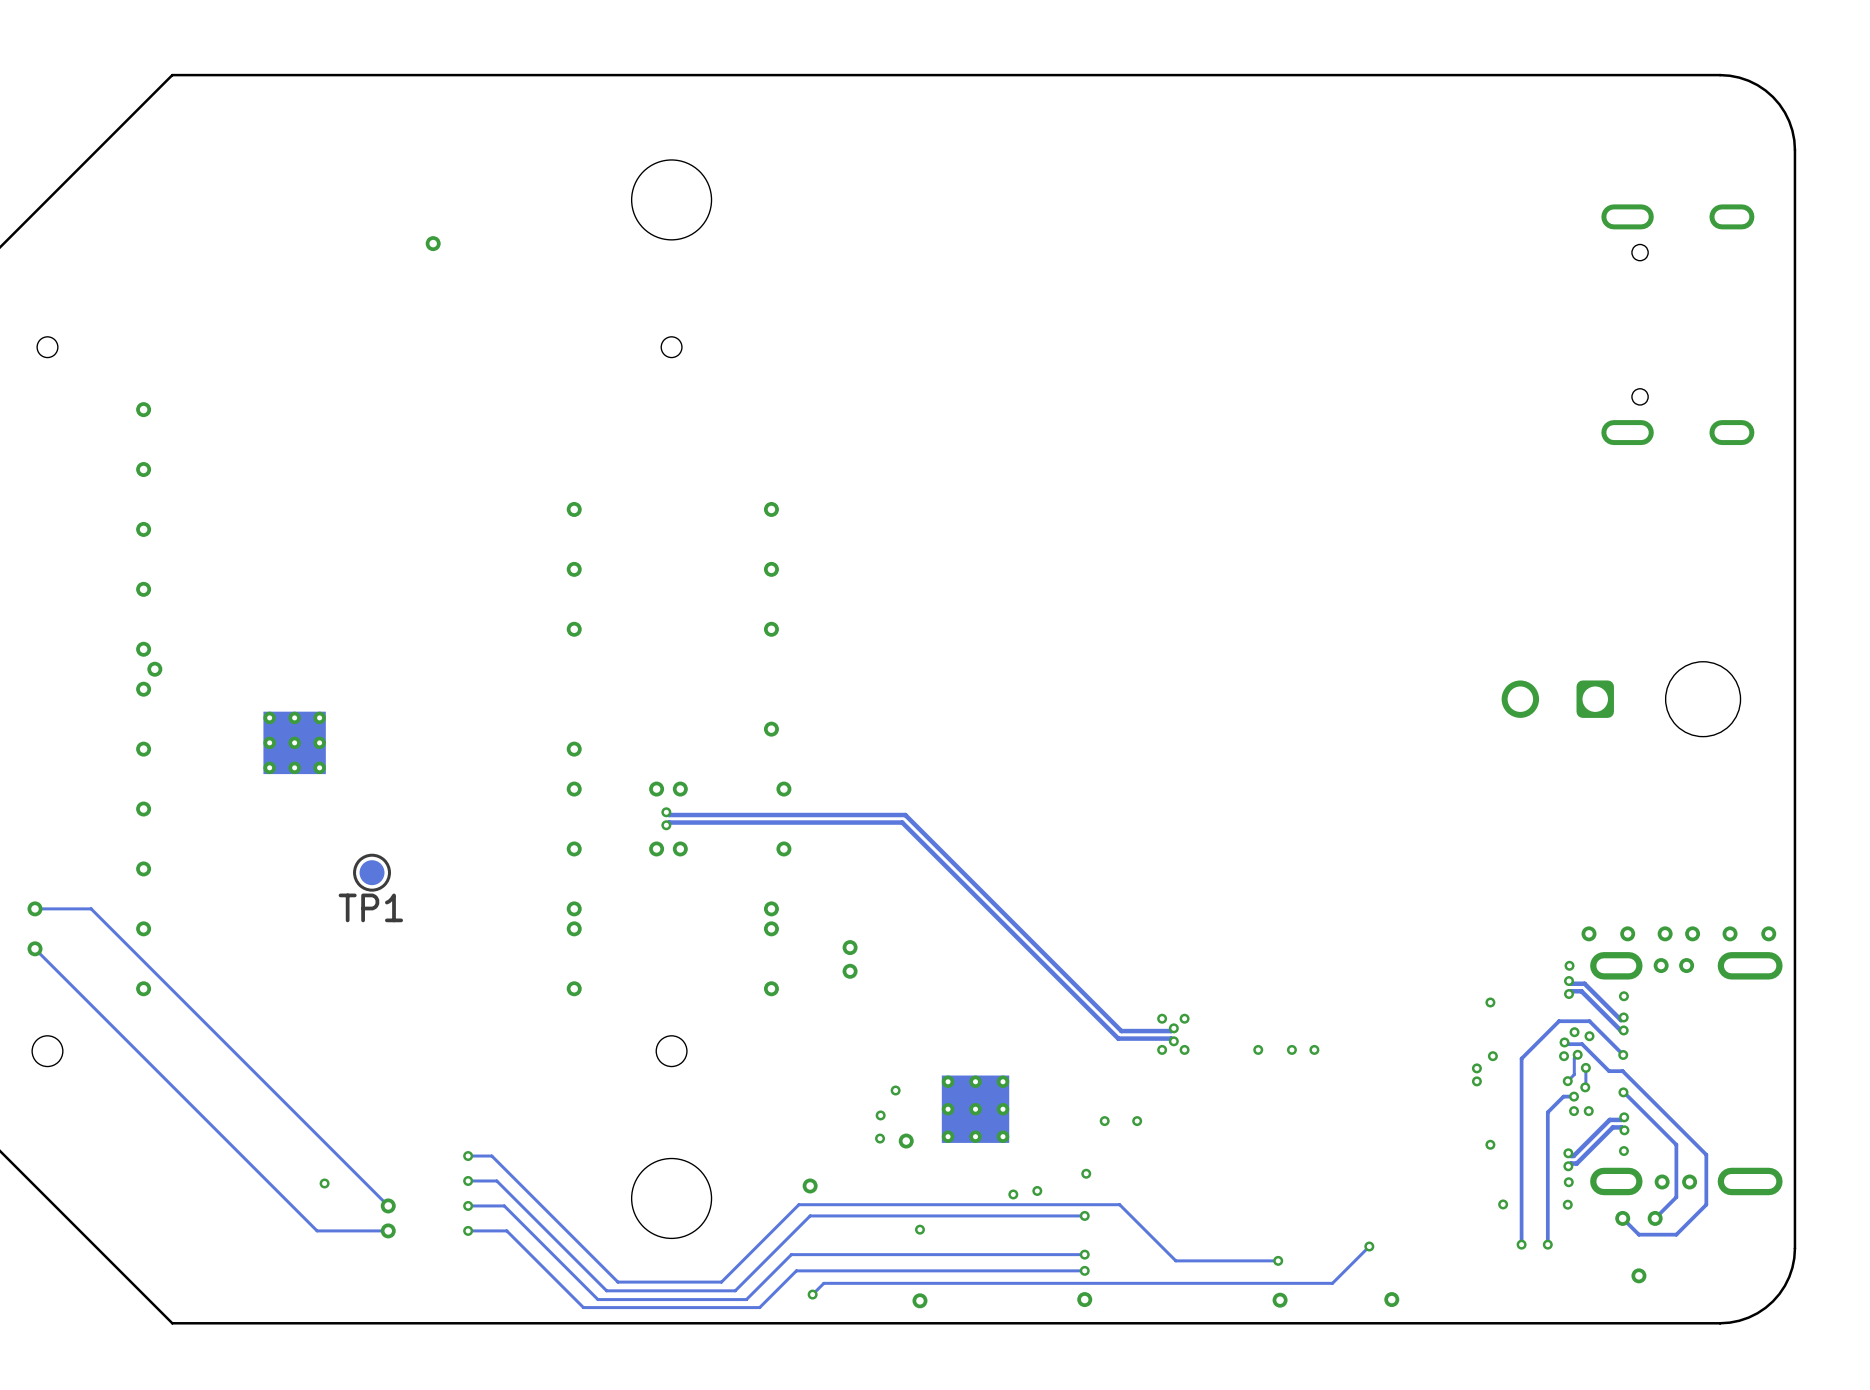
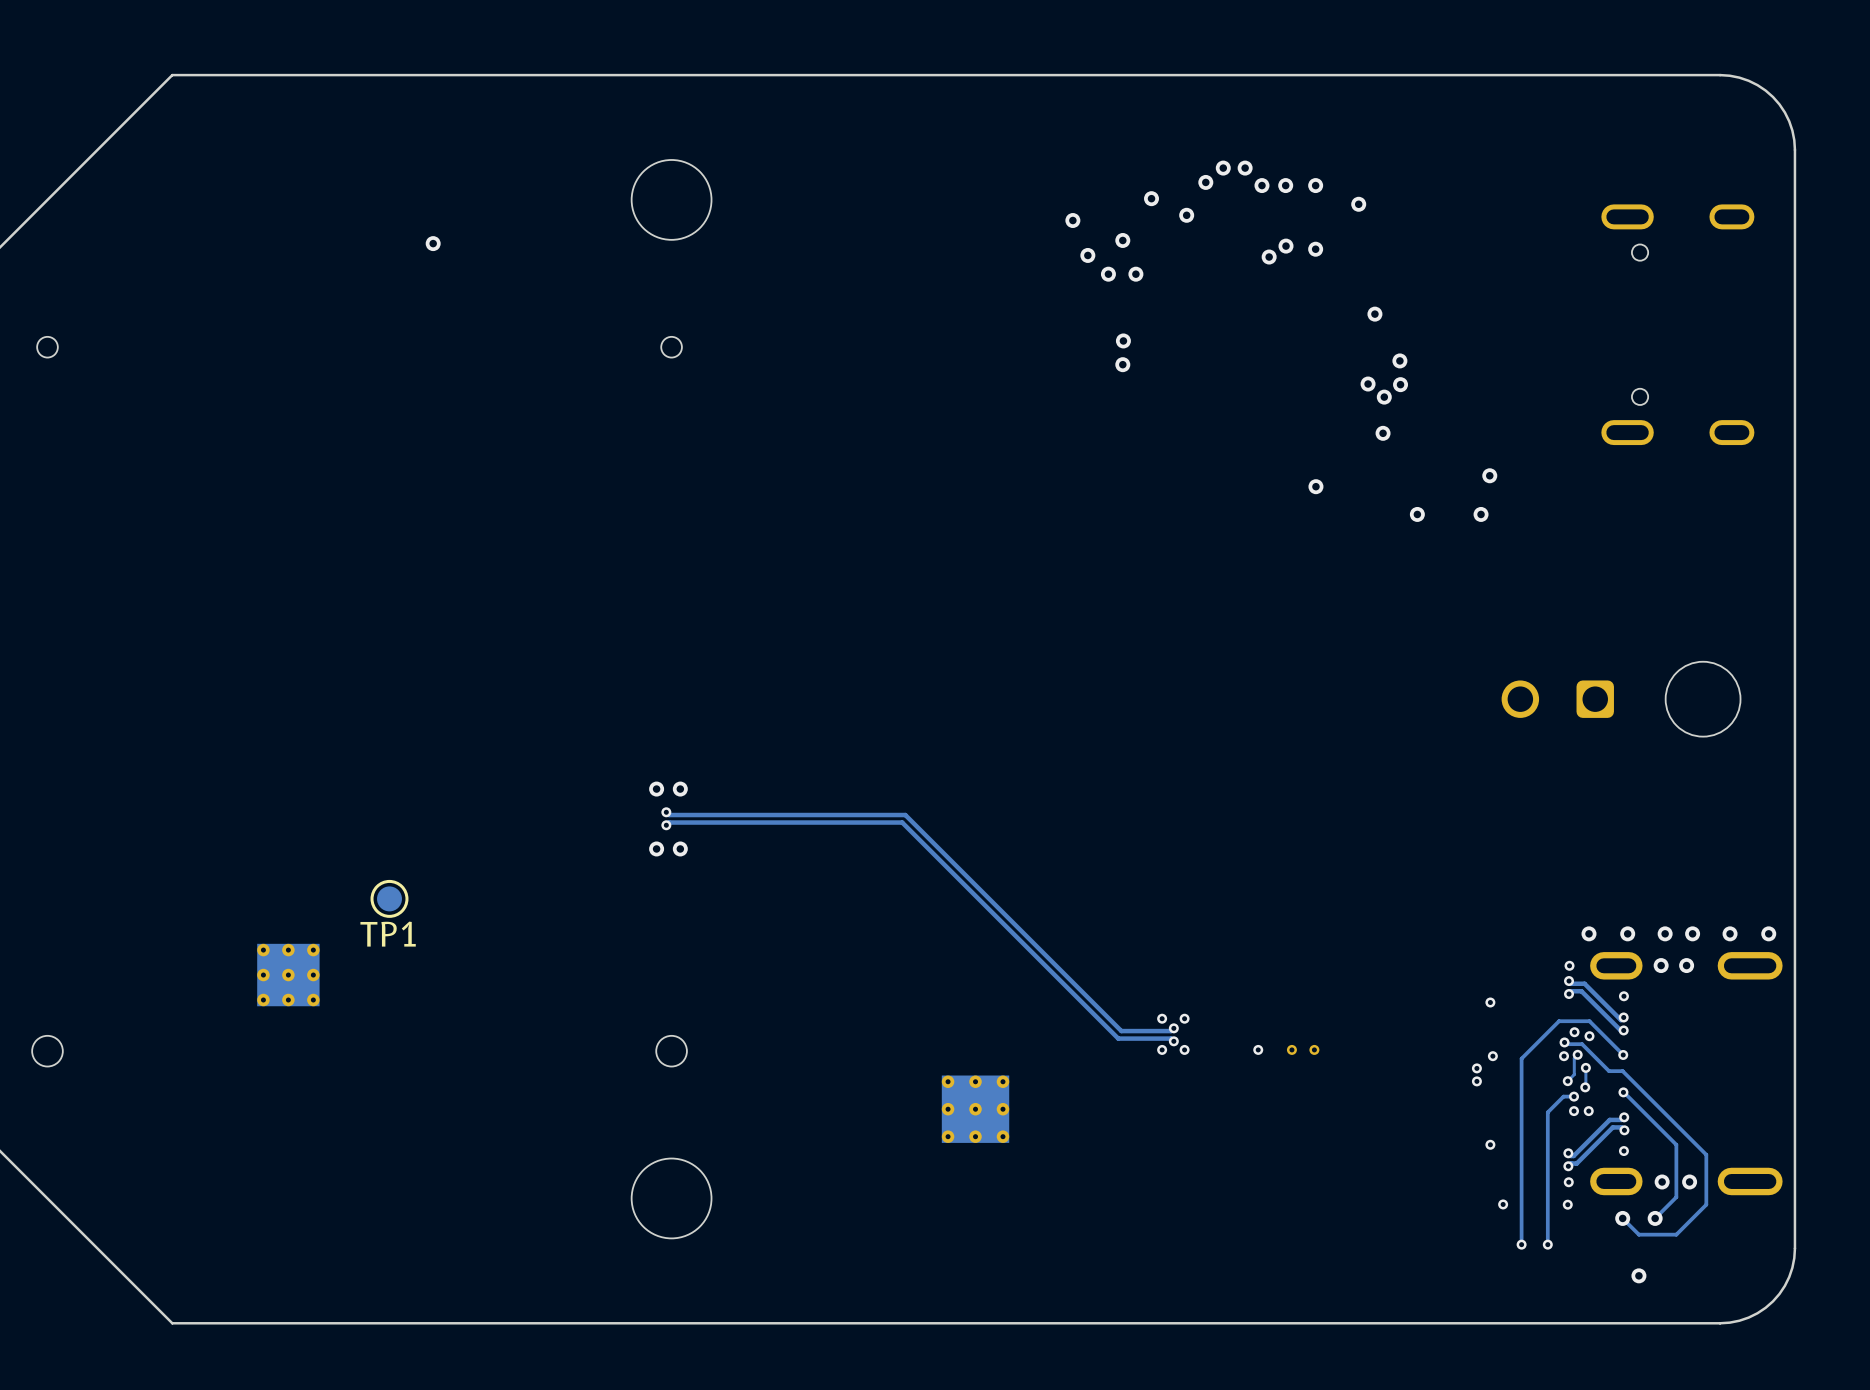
via: none -> (1223, 168)
via: none -> (1245, 168)
via: none -> (1205, 182)
via: none -> (1261, 185)
via: none -> (1285, 185)
via: none -> (1315, 185)
via: none -> (1151, 198)
via: none -> (1358, 204)
via: none -> (1186, 215)
via: none -> (1072, 220)
via: none -> (1122, 240)
via: none -> (1286, 246)
via: none -> (1315, 249)
via: none -> (1087, 255)
via: none -> (1269, 257)
via: none -> (1108, 274)
via: none -> (1135, 274)
via: none -> (1374, 314)
via: none -> (1123, 340)
via: none -> (1399, 360)
via: none -> (1122, 364)
via: none -> (1368, 384)
via: none -> (1400, 384)
via: none -> (1384, 397)
via: (143, 409) -> none
via: none -> (1383, 433)
via: (143, 469) -> none
via: none -> (1489, 475)
via: none -> (1315, 486)
via: (574, 509) -> none
via: (771, 509) -> none
via: none -> (1417, 514)
via: none -> (1481, 514)
via: (143, 529) -> none
via: (574, 569) -> none
via: (771, 569) -> none
via: (143, 589) -> none
via: (574, 629) -> none
via: (771, 629) -> none
via: (143, 649) -> none
via: (154, 669) -> none
via: (143, 689) -> none
via: (771, 729) -> none
part position: (294, 742) -> (288, 975)
via: (143, 749) -> none
via: (574, 749) -> none
via: (574, 789) -> none
via: (783, 789) -> none
via: (143, 809) -> none
via: (574, 848) -> none
via: (783, 848) -> none
via: (143, 868) -> none
TP1 position: (372, 872) -> (389, 898)
track: (35, 908) (91, 908) (388, 1205) -> none
via: (35, 908) -> none
via: (574, 908) -> none
via: (771, 908) -> none
via: (143, 928) -> none
via: (574, 928) -> none
via: (771, 928) -> none
via: (850, 947) -> none
track: (35, 948) (317, 1230) (388, 1230) -> none
via: (35, 948) -> none
via: (850, 971) -> none
via: (143, 988) -> none
via: (574, 988) -> none
via: (771, 988) -> none
via: (895, 1090) -> none
via: (880, 1115) -> none
via: (1104, 1121) -> none
via: (1137, 1121) -> none
via: (880, 1138) -> none
via: (906, 1141) -> none
track: (468, 1156) (491, 1156) (617, 1282) (721, 1282) (798, 1204) (1119, 1204) (1175, 1260) (1278, 1260) -> none
via: (468, 1156) -> none
via: (1086, 1173) -> none
track: (468, 1180) (496, 1180) (606, 1290) (735, 1290) (810, 1215) (1084, 1215) -> none
via: (468, 1180) -> none
via: (324, 1183) -> none
via: (810, 1185) -> none
via: (1037, 1190) -> none
via: (1013, 1194) -> none
via: (388, 1205) -> none
track: (468, 1205) (504, 1205) (597, 1299) (746, 1299) (791, 1254) (1084, 1254) -> none
via: (468, 1205) -> none
via: (1084, 1215) -> none
via: (919, 1229) -> none
via: (388, 1230) -> none
track: (468, 1230) (506, 1230) (583, 1307) (759, 1307) (796, 1270) (1084, 1270) -> none
via: (468, 1230) -> none
track: (1369, 1246) (1332, 1283) (823, 1283) (812, 1294) -> none
via: (1369, 1246) -> none
via: (1084, 1254) -> none
via: (1278, 1260) -> none
via: (1084, 1270) -> none
via: (812, 1294) -> none
via: (1084, 1299) -> none
via: (1391, 1299) -> none
via: (919, 1300) -> none
via: (1280, 1300) -> none

